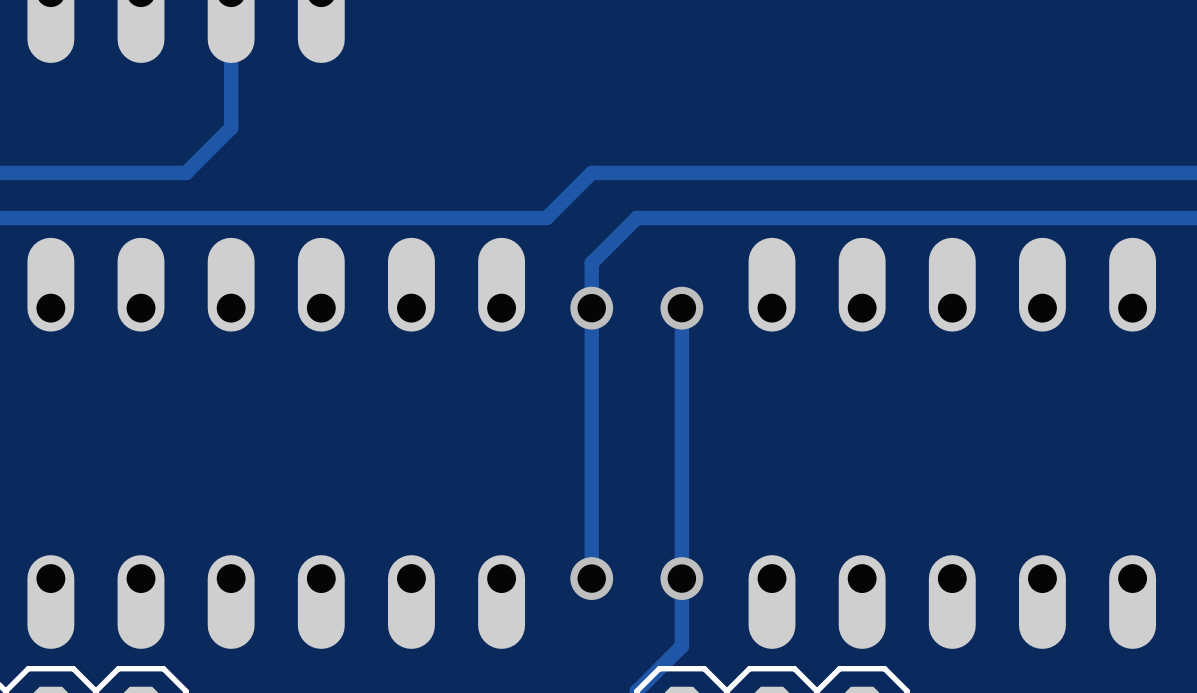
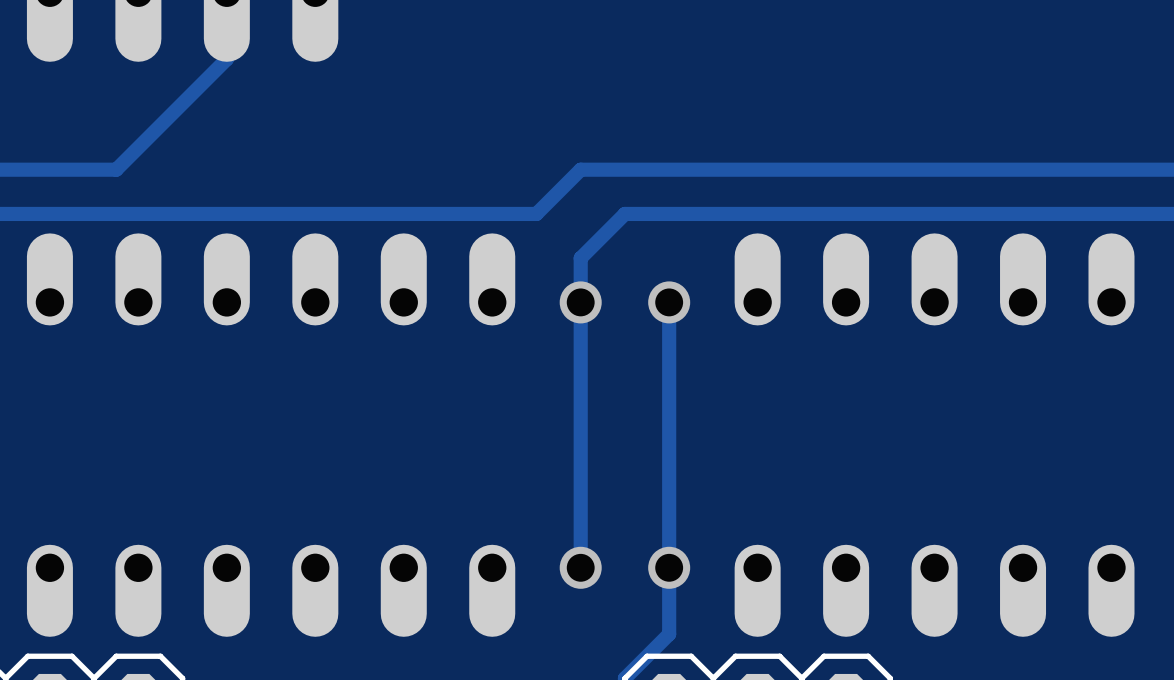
track: (231, 60) (231, 127) (186, 172) (118, 172) -> (226, 59) (116, 169)

